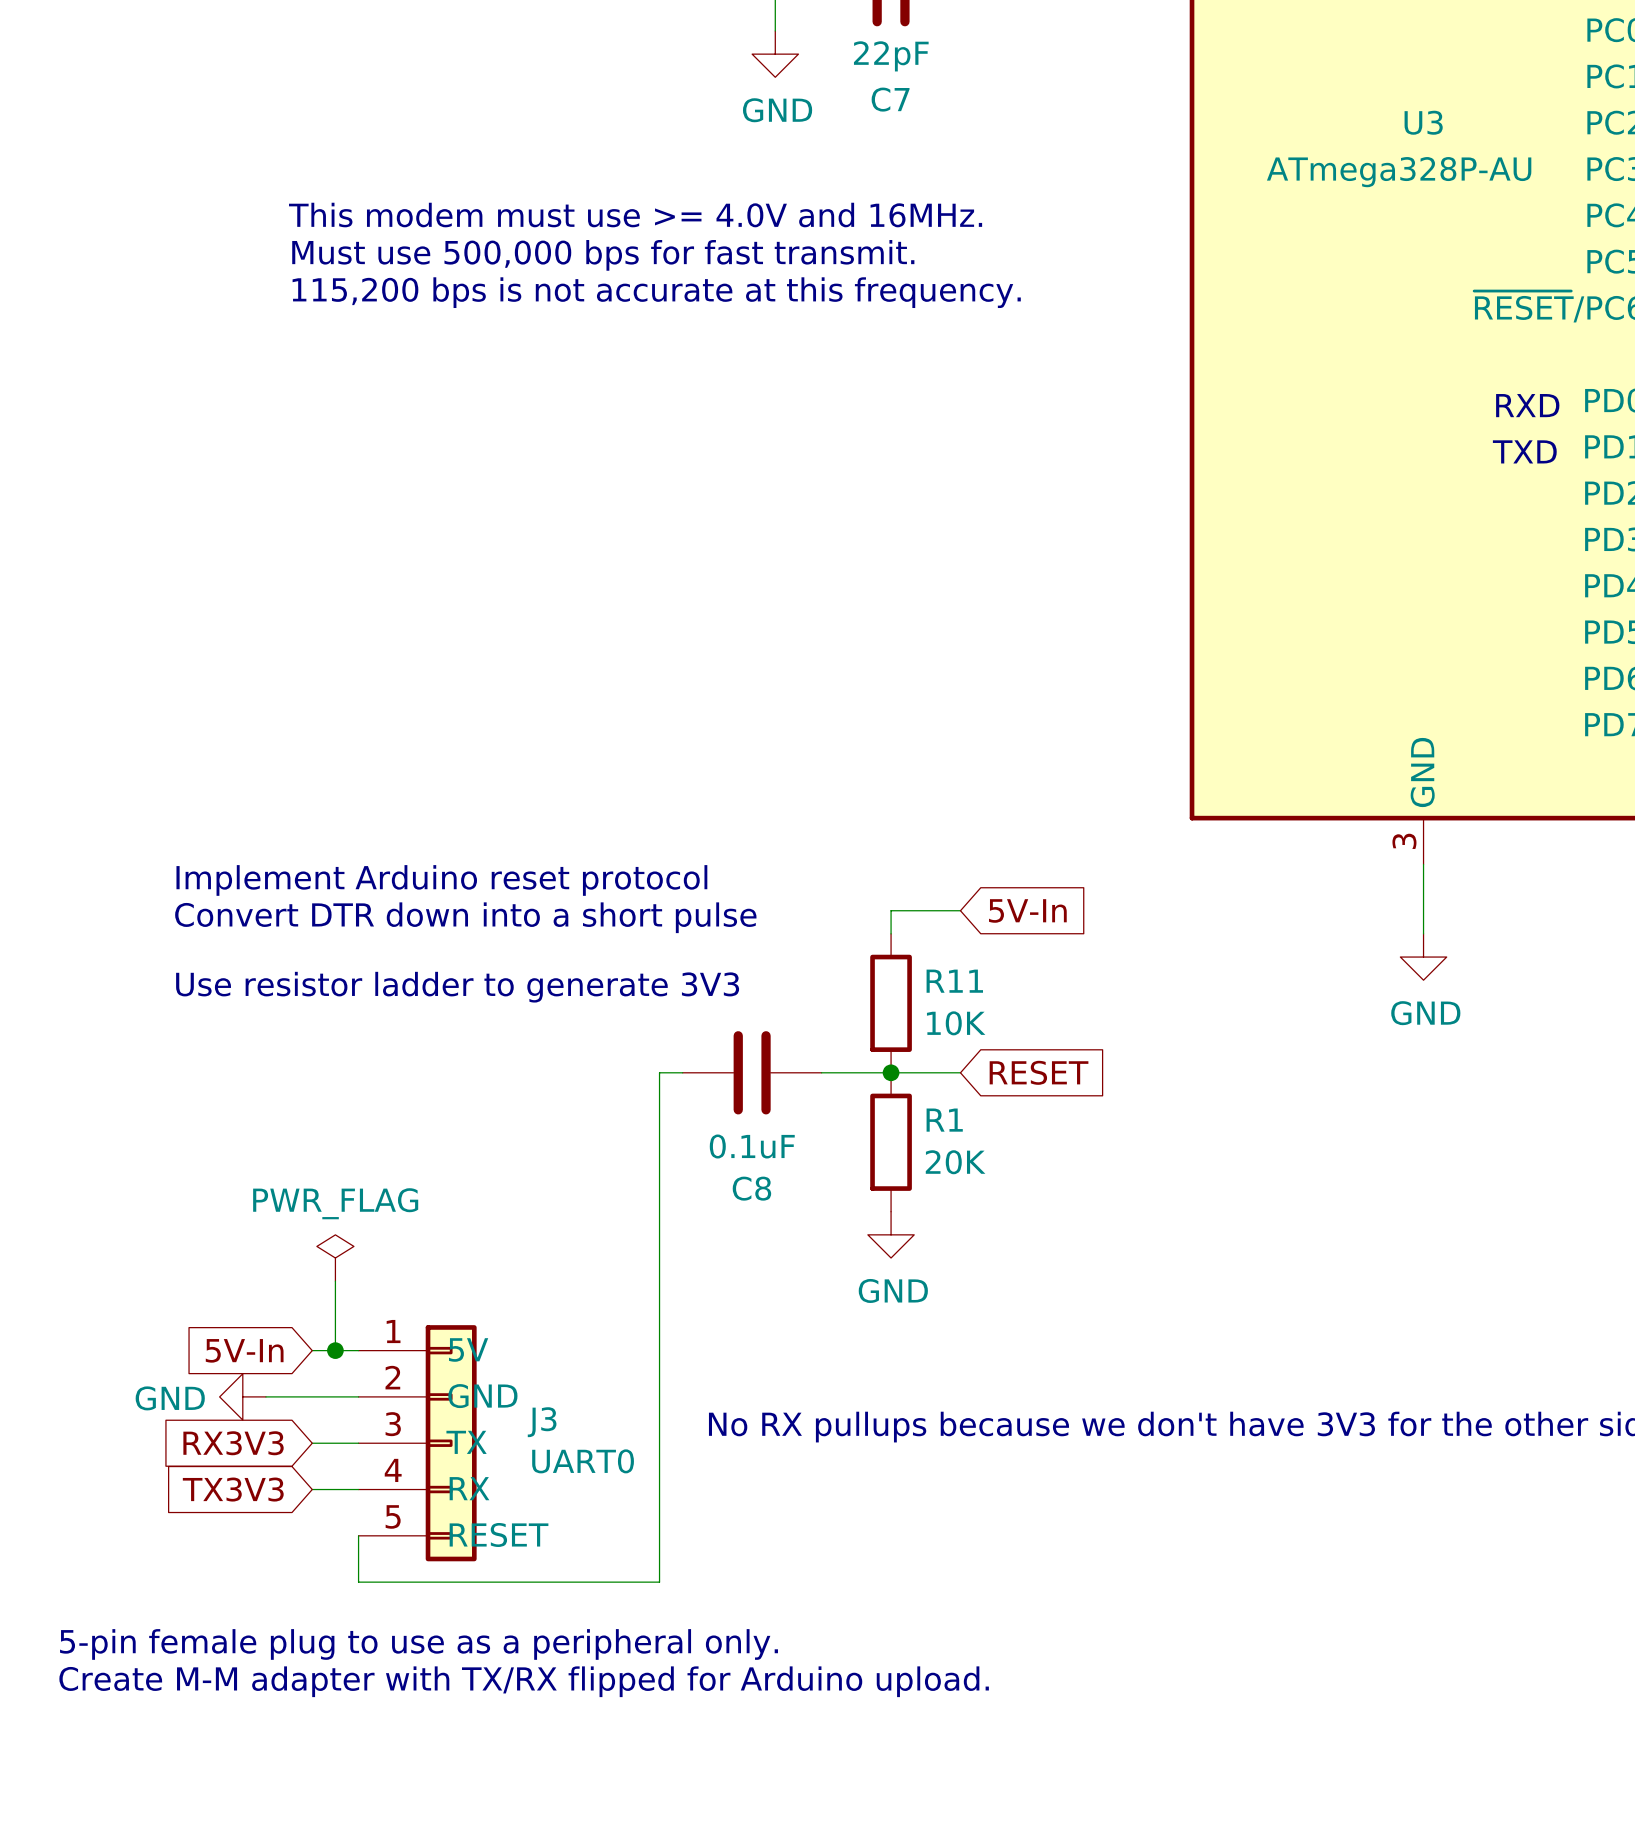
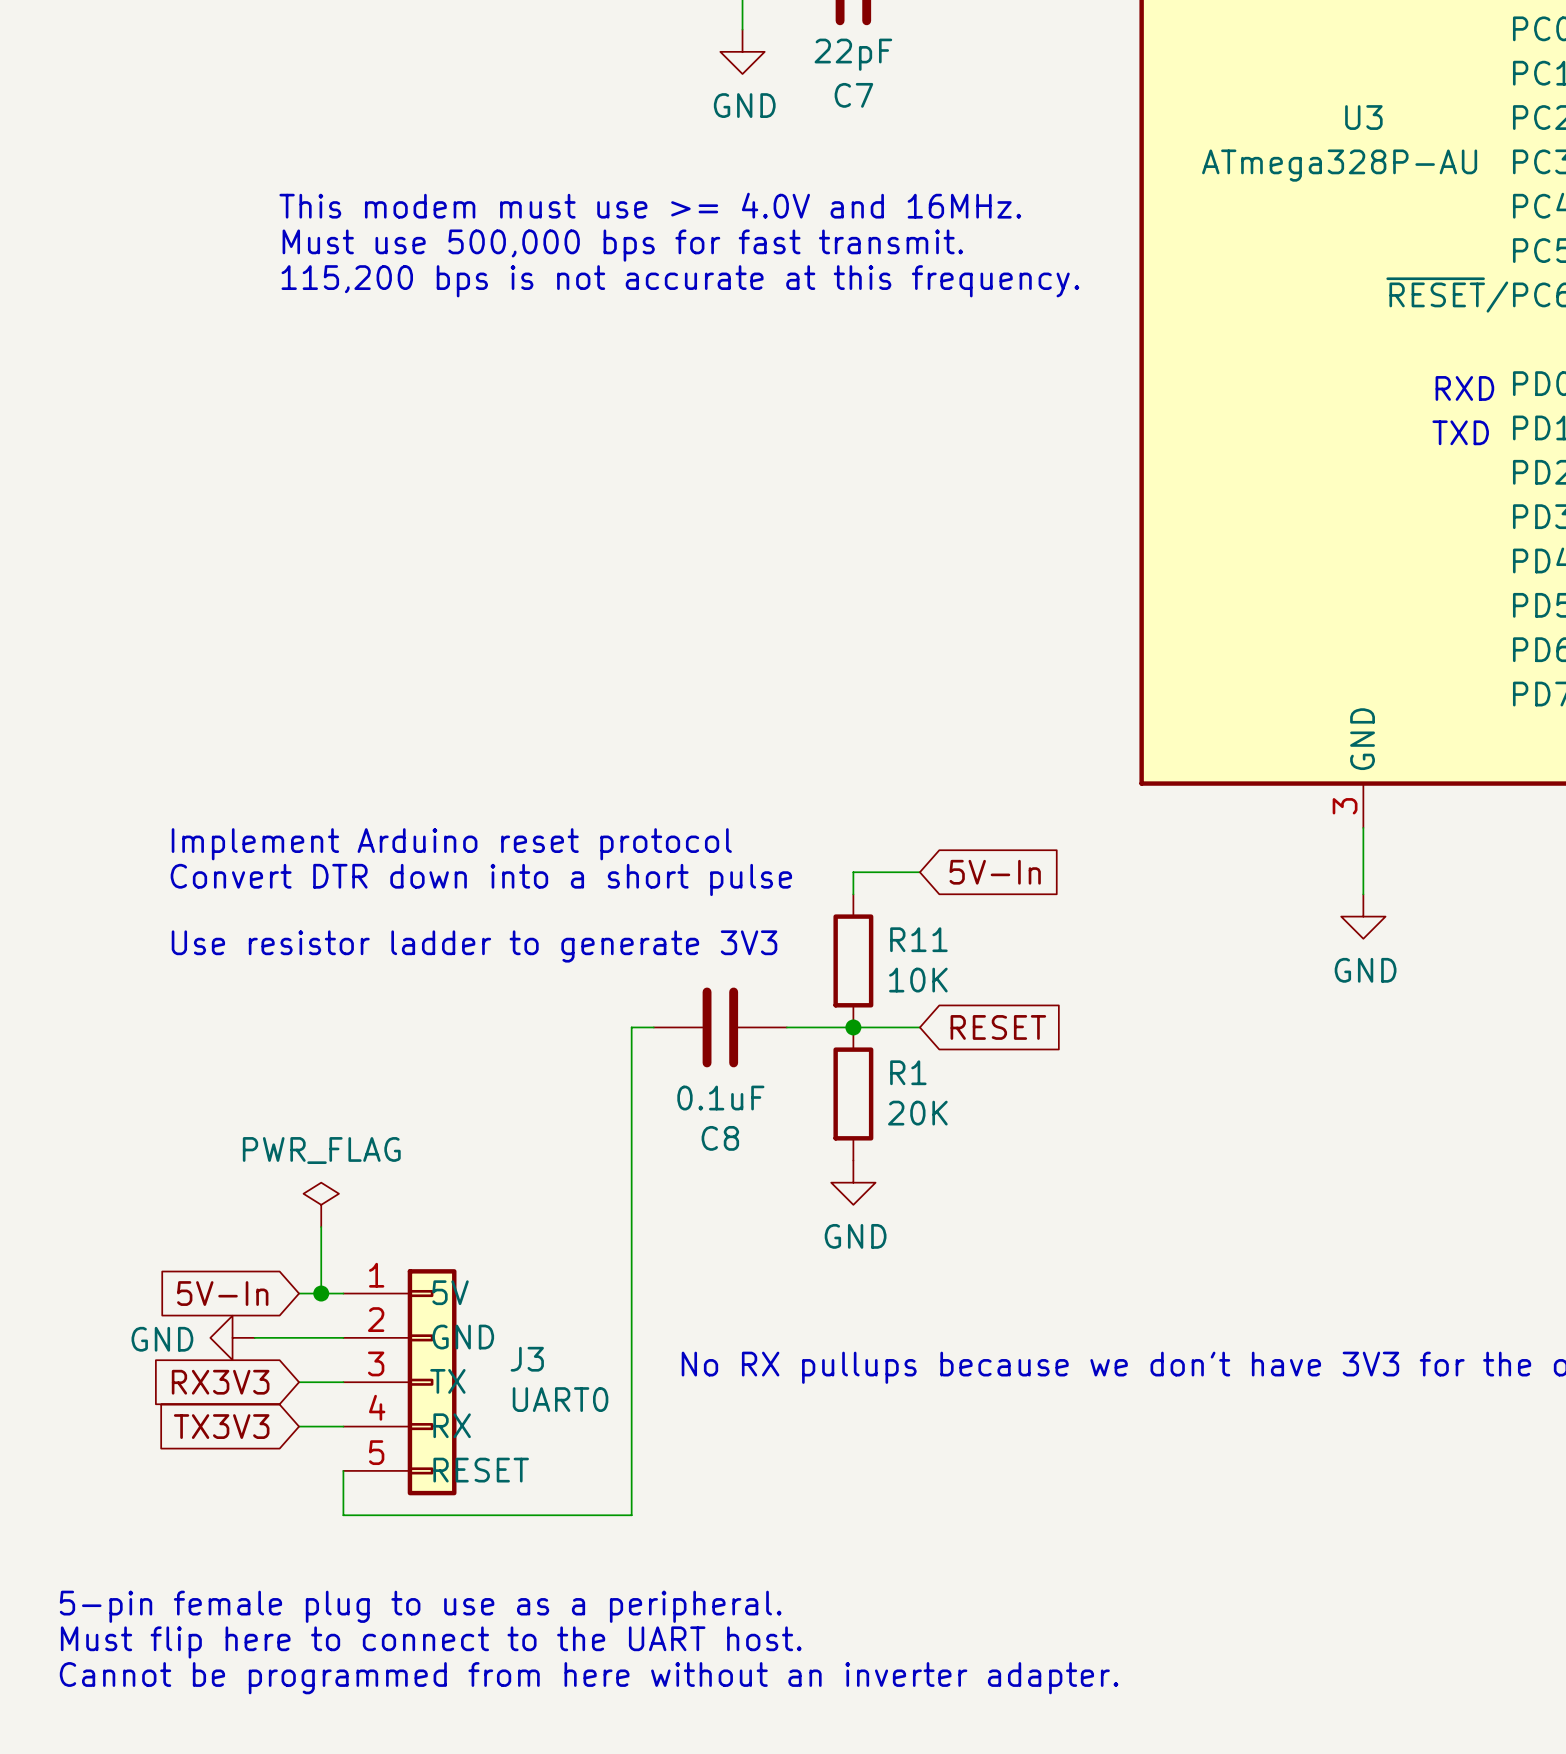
text: 5-pin female plug to use as a peripheral only. (419, 1644) -> none
text: Create M-M adapter with TX/RX flipped for Arduino upload. (524, 1681) -> 5-pin female plug to use as a peripheral. (420, 1606)
text: none -> Must flip here to connect to the UART host. (431, 1642)
text: none -> Cannot be programmed from here without an inverter adapter. (589, 1678)

